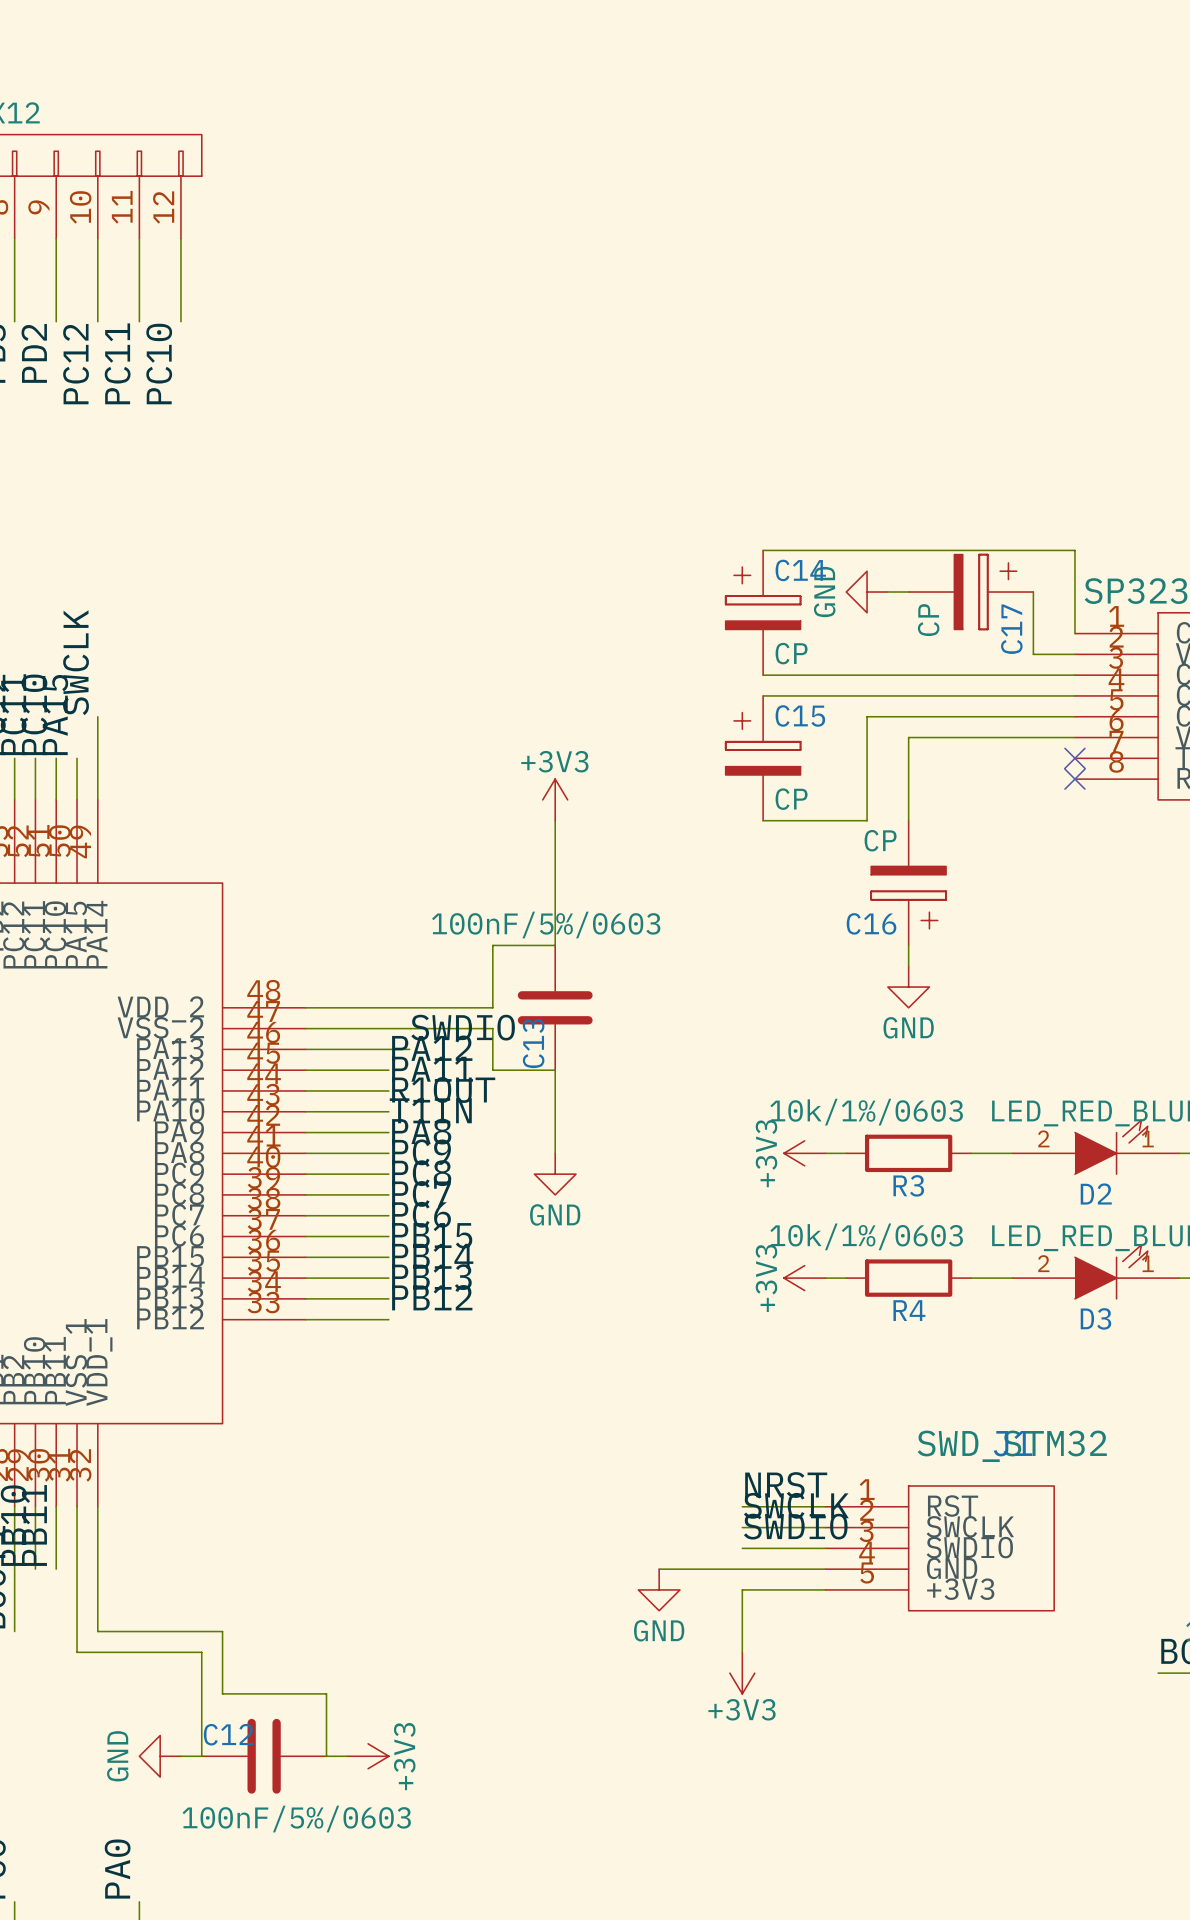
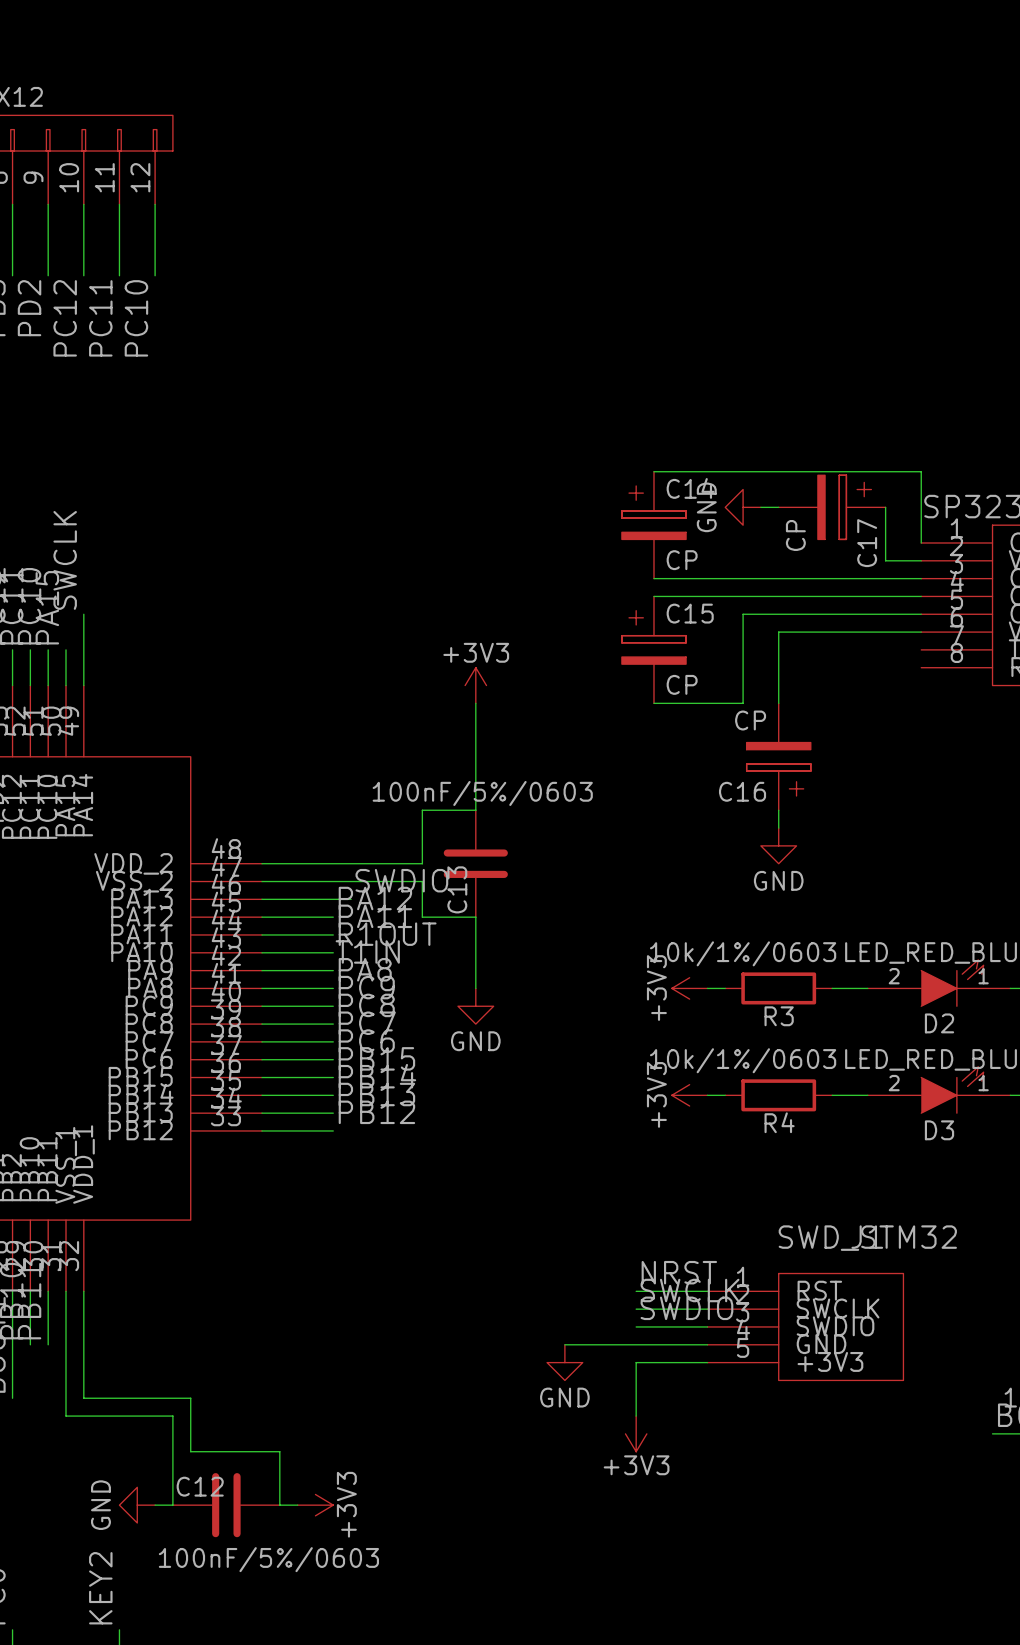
no-connect mark: (1074, 758) -> none
no-connect mark: (1074, 779) -> none
label: PA0 (117, 1869) -> KEY2 (100, 1588)

